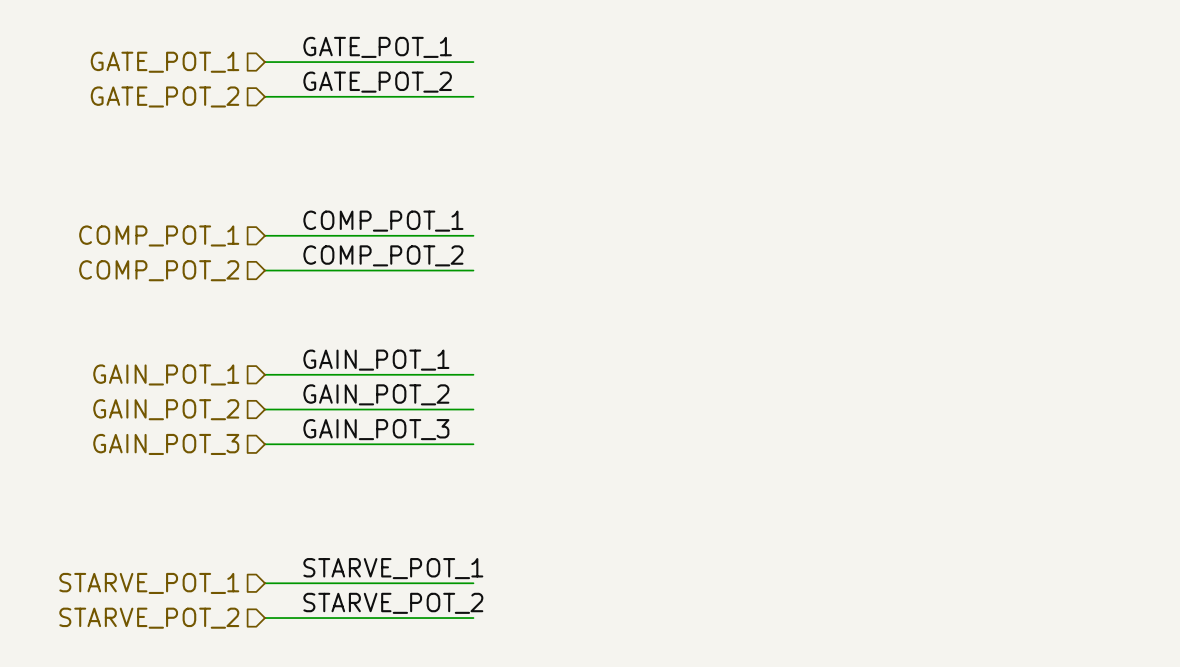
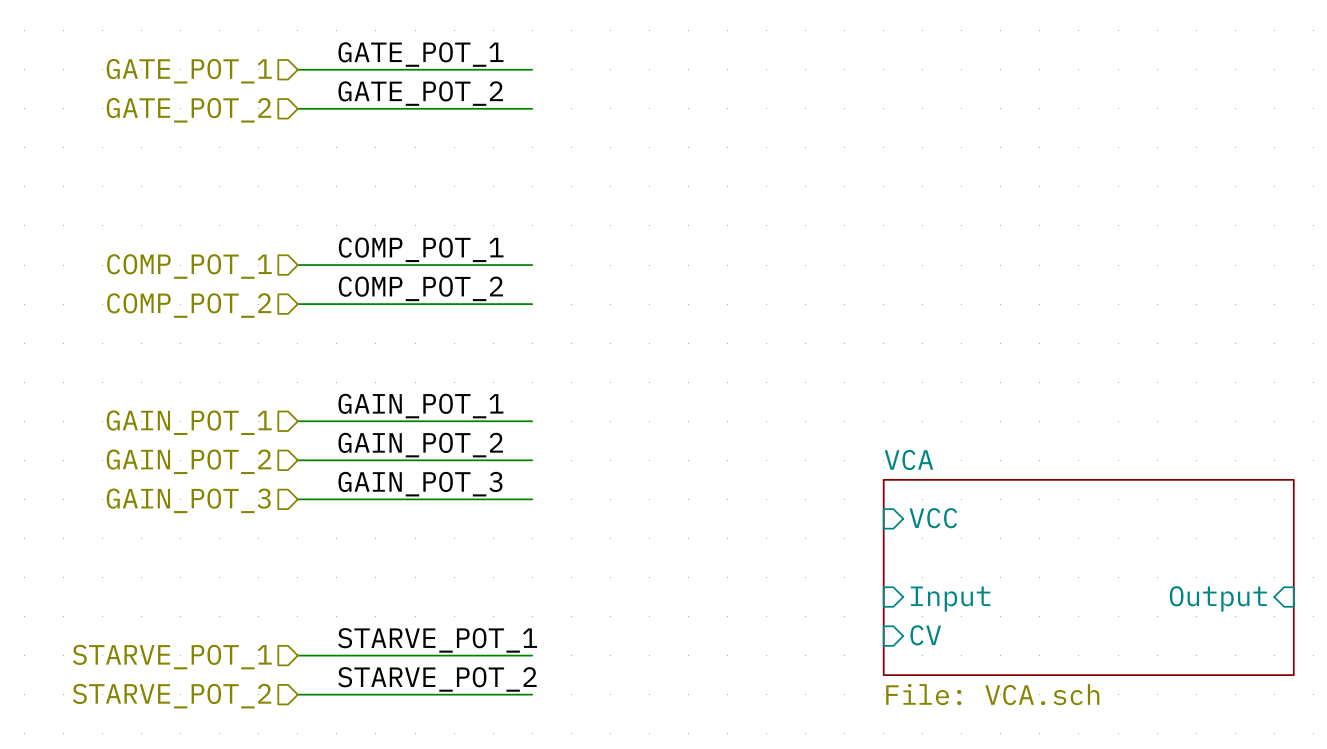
sheet pin: none -> VCC (933, 518)
sheet VCA: none -> File: VCA.sch (1088, 577)
sheet pin: none -> Input (950, 599)
sheet pin: none -> Output (1218, 598)
sheet pin: none -> CV (925, 635)

